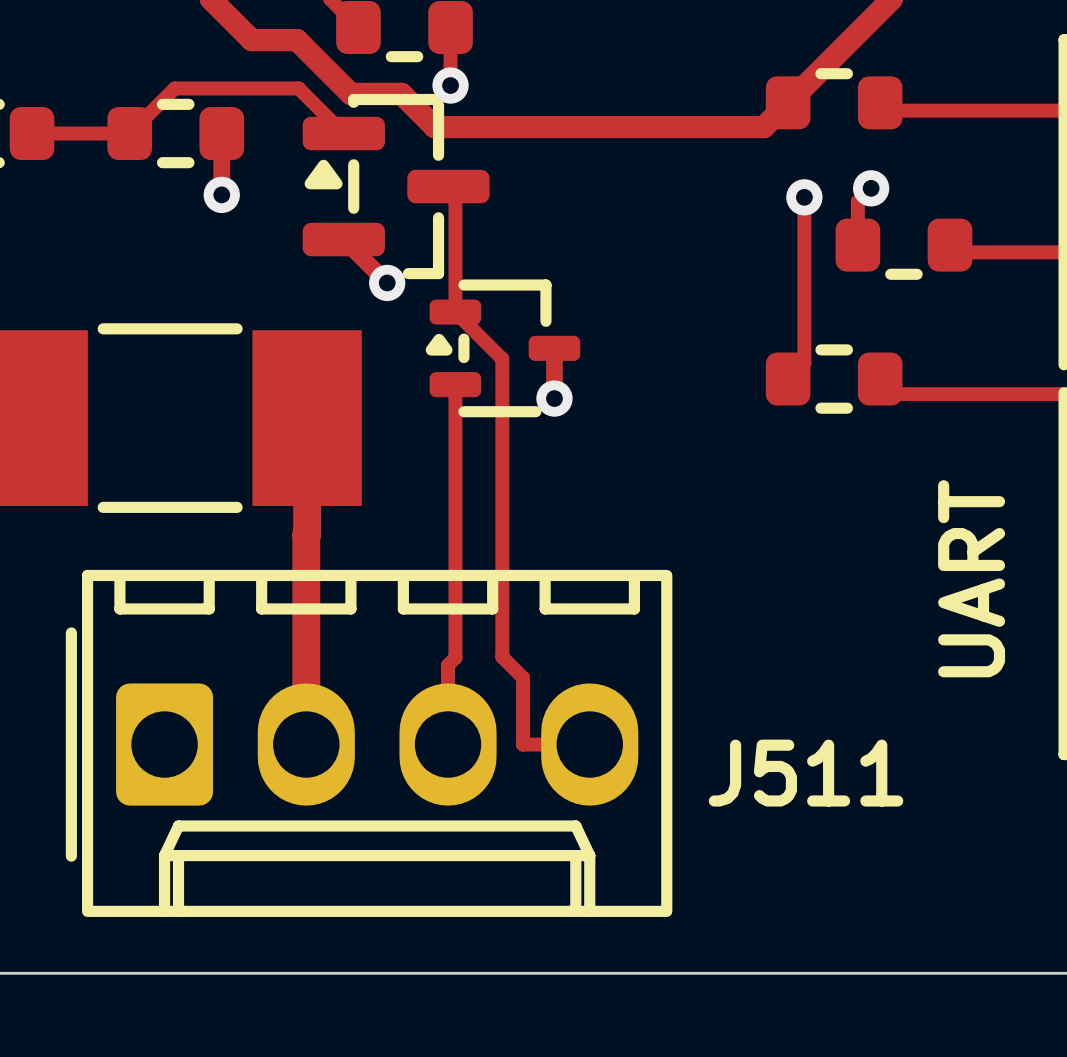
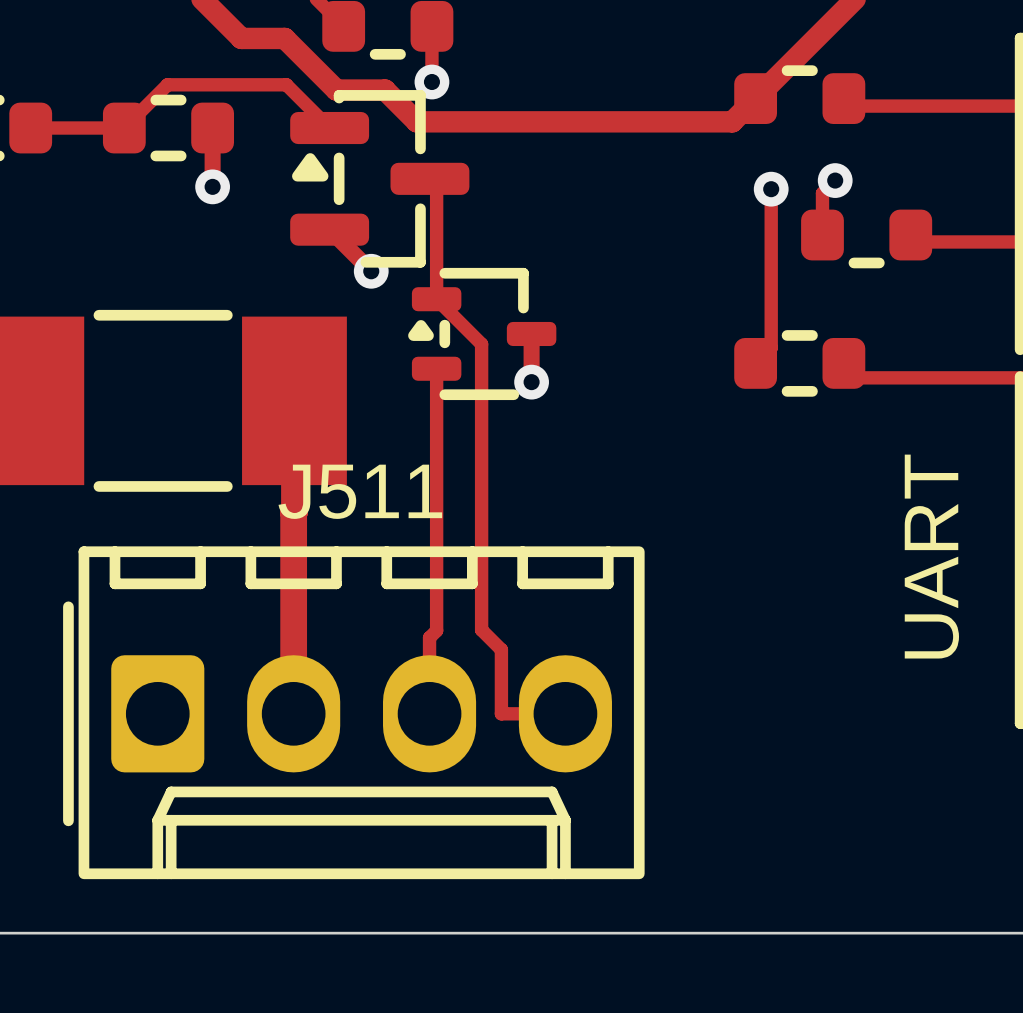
part footprint: [302, 93, 490, 280] -> [290, 90, 470, 268]
J511 name position: J511 (806, 773) -> J511 (360, 491)

